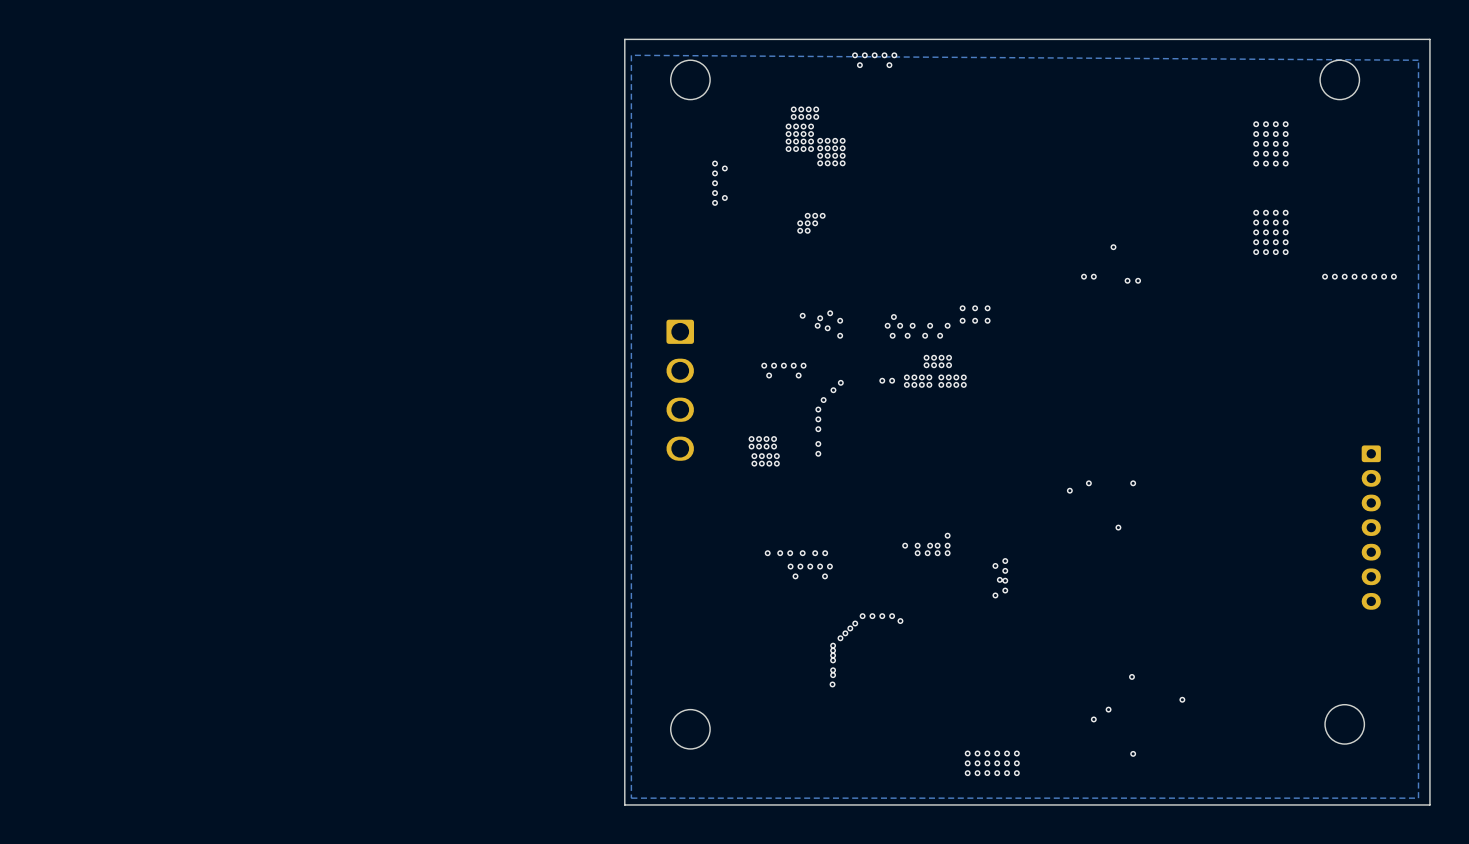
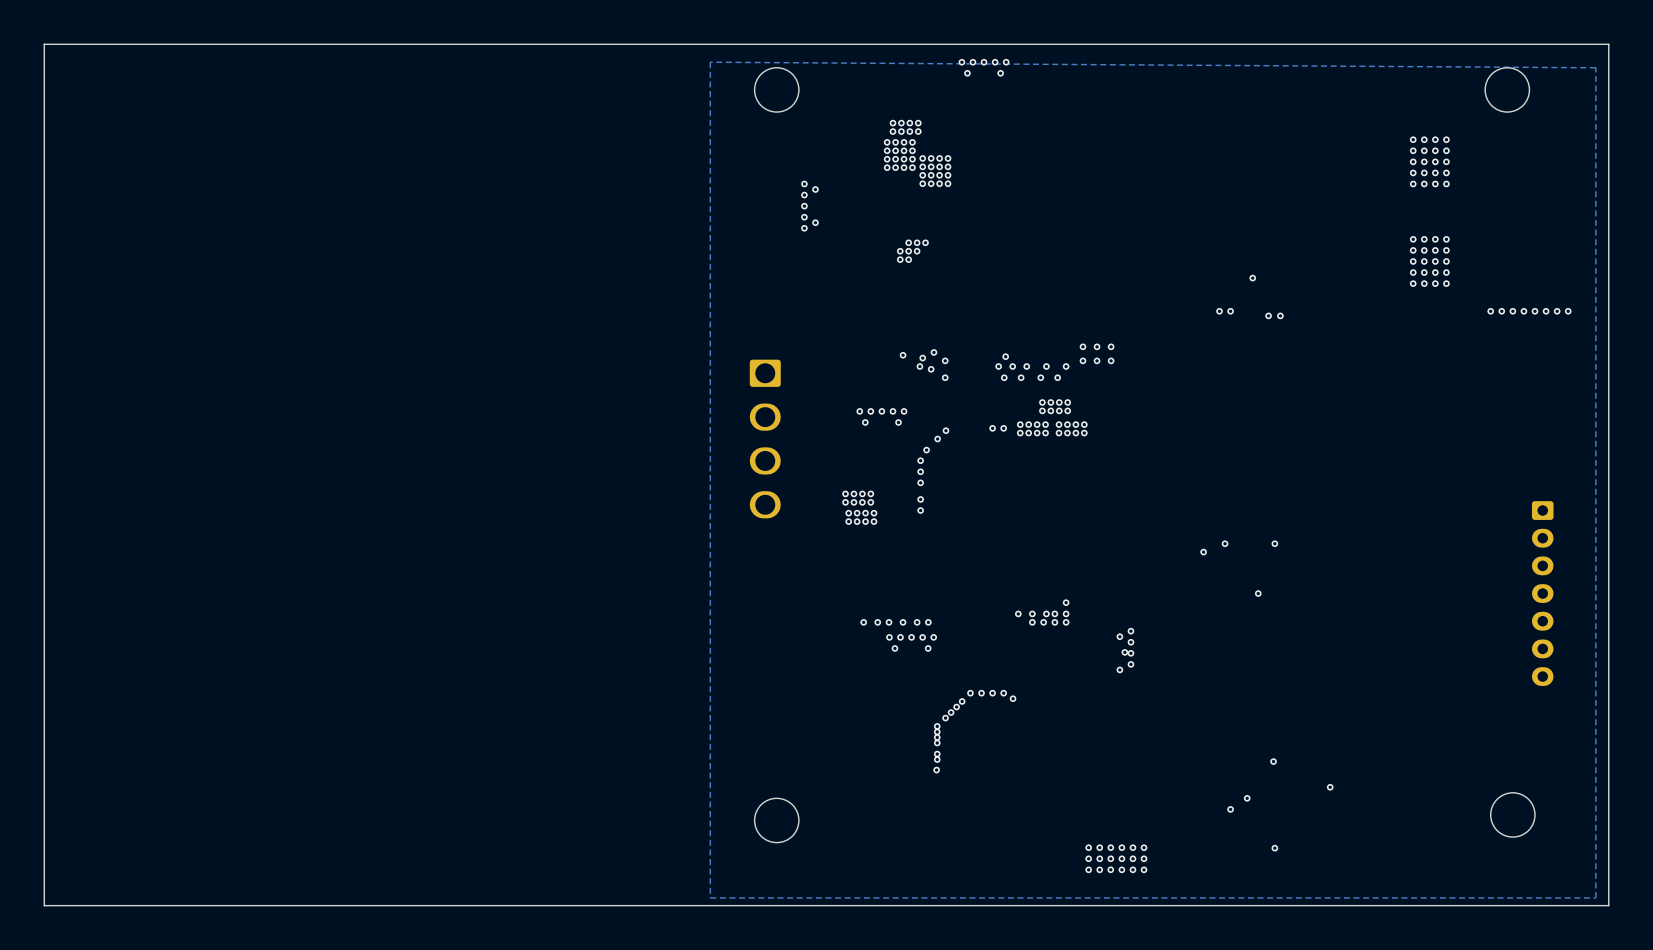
board edge: (624, 39) (624, 804) -> (702, 44) (44, 44) (44, 905) (702, 905)

